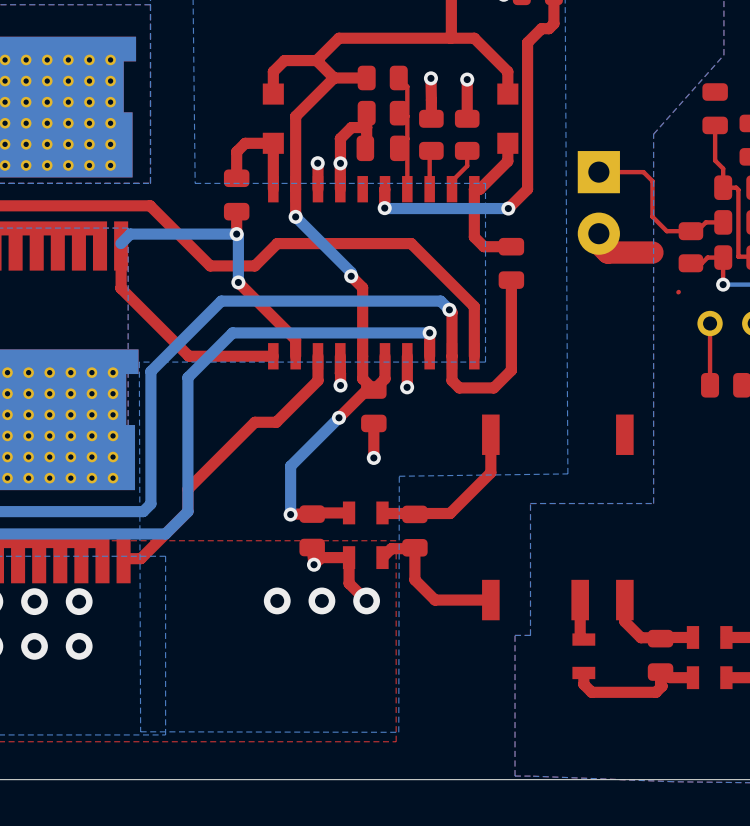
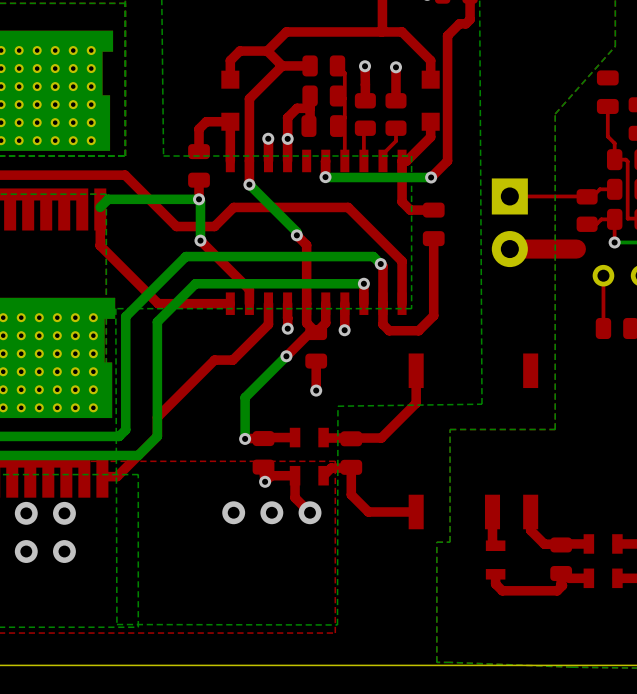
top track: (598, 172) (643, 172) (652, 181) (652, 216) (666, 231) (690, 231) -> (509, 196) (586, 196)
part position: (598, 202) -> (509, 222)
top track: (598, 233) (598, 243) (607, 252) (652, 252) -> none
top track: none -> (576, 249) (509, 249)

